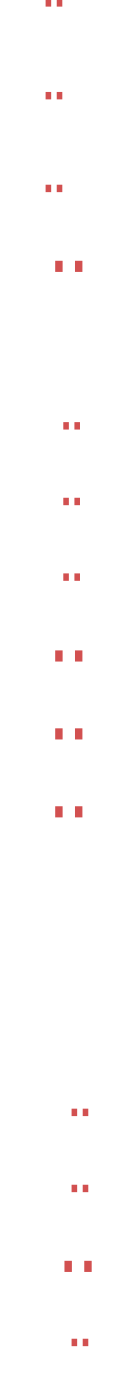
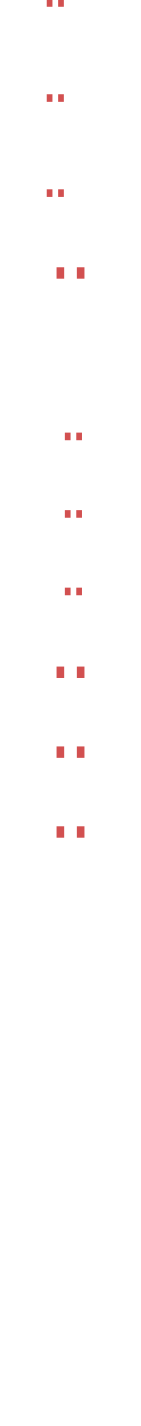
part: (79, 1112) -> none
part: (79, 1188) -> none
part: (78, 1266) -> none
part: (79, 1342) -> none

